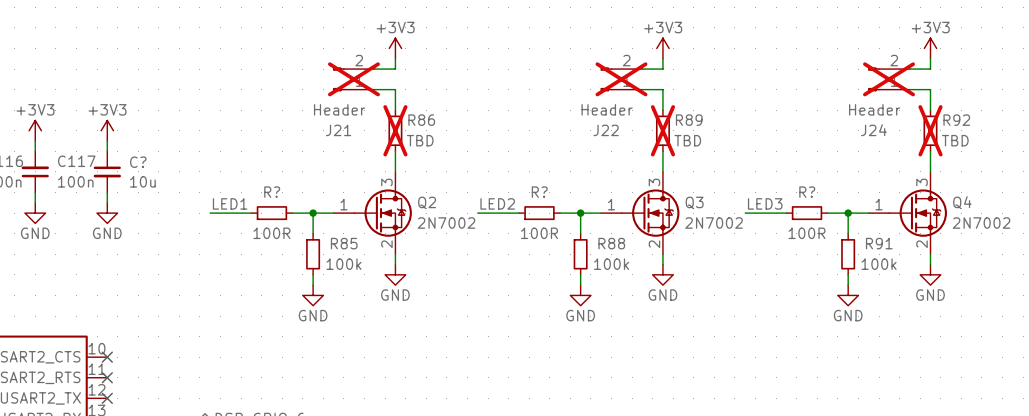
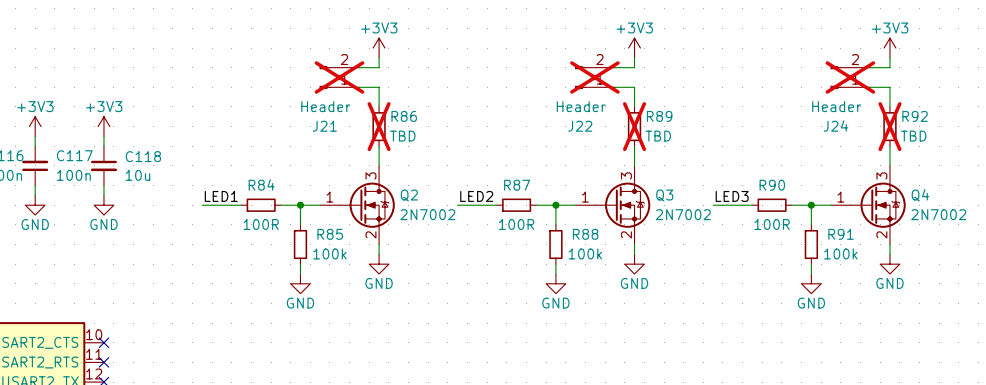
C? name: C? (138, 162) -> C118 (143, 156)
R? name: R? (272, 192) -> R84 (261, 184)
R? name: R? (539, 192) -> R87 (517, 185)
R? name: R? (807, 192) -> R90 (772, 185)

